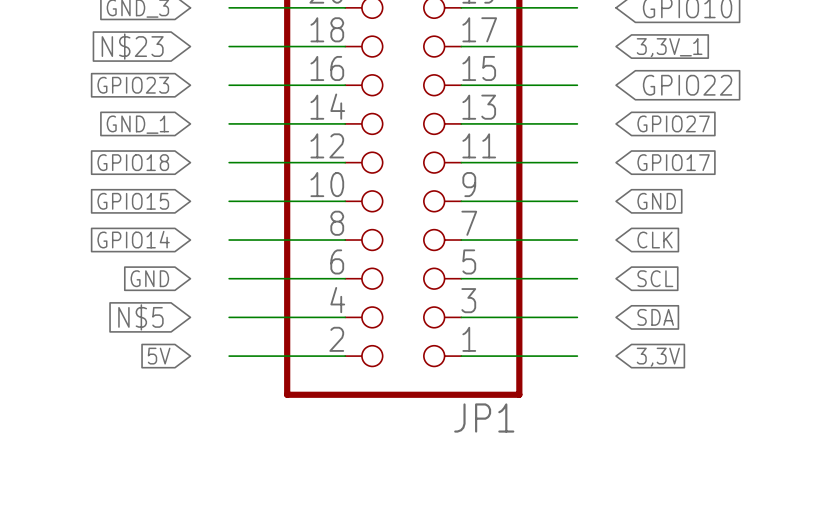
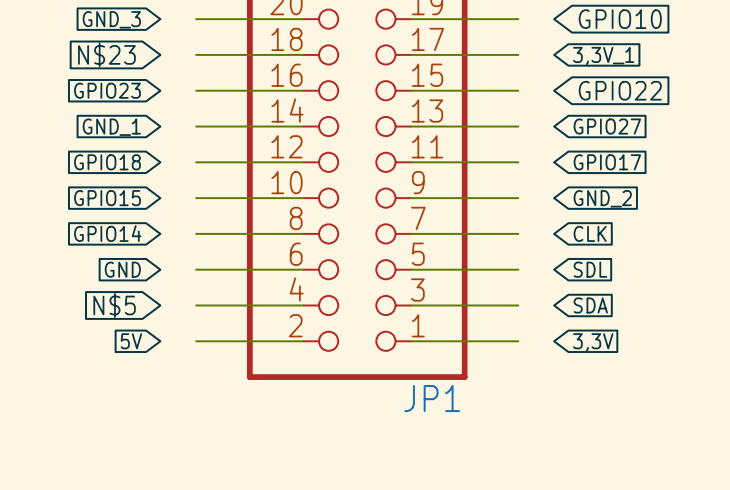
global label: GND (656, 201) -> GND_2 (602, 198)
global label: SCL (655, 278) -> SDL (590, 269)

